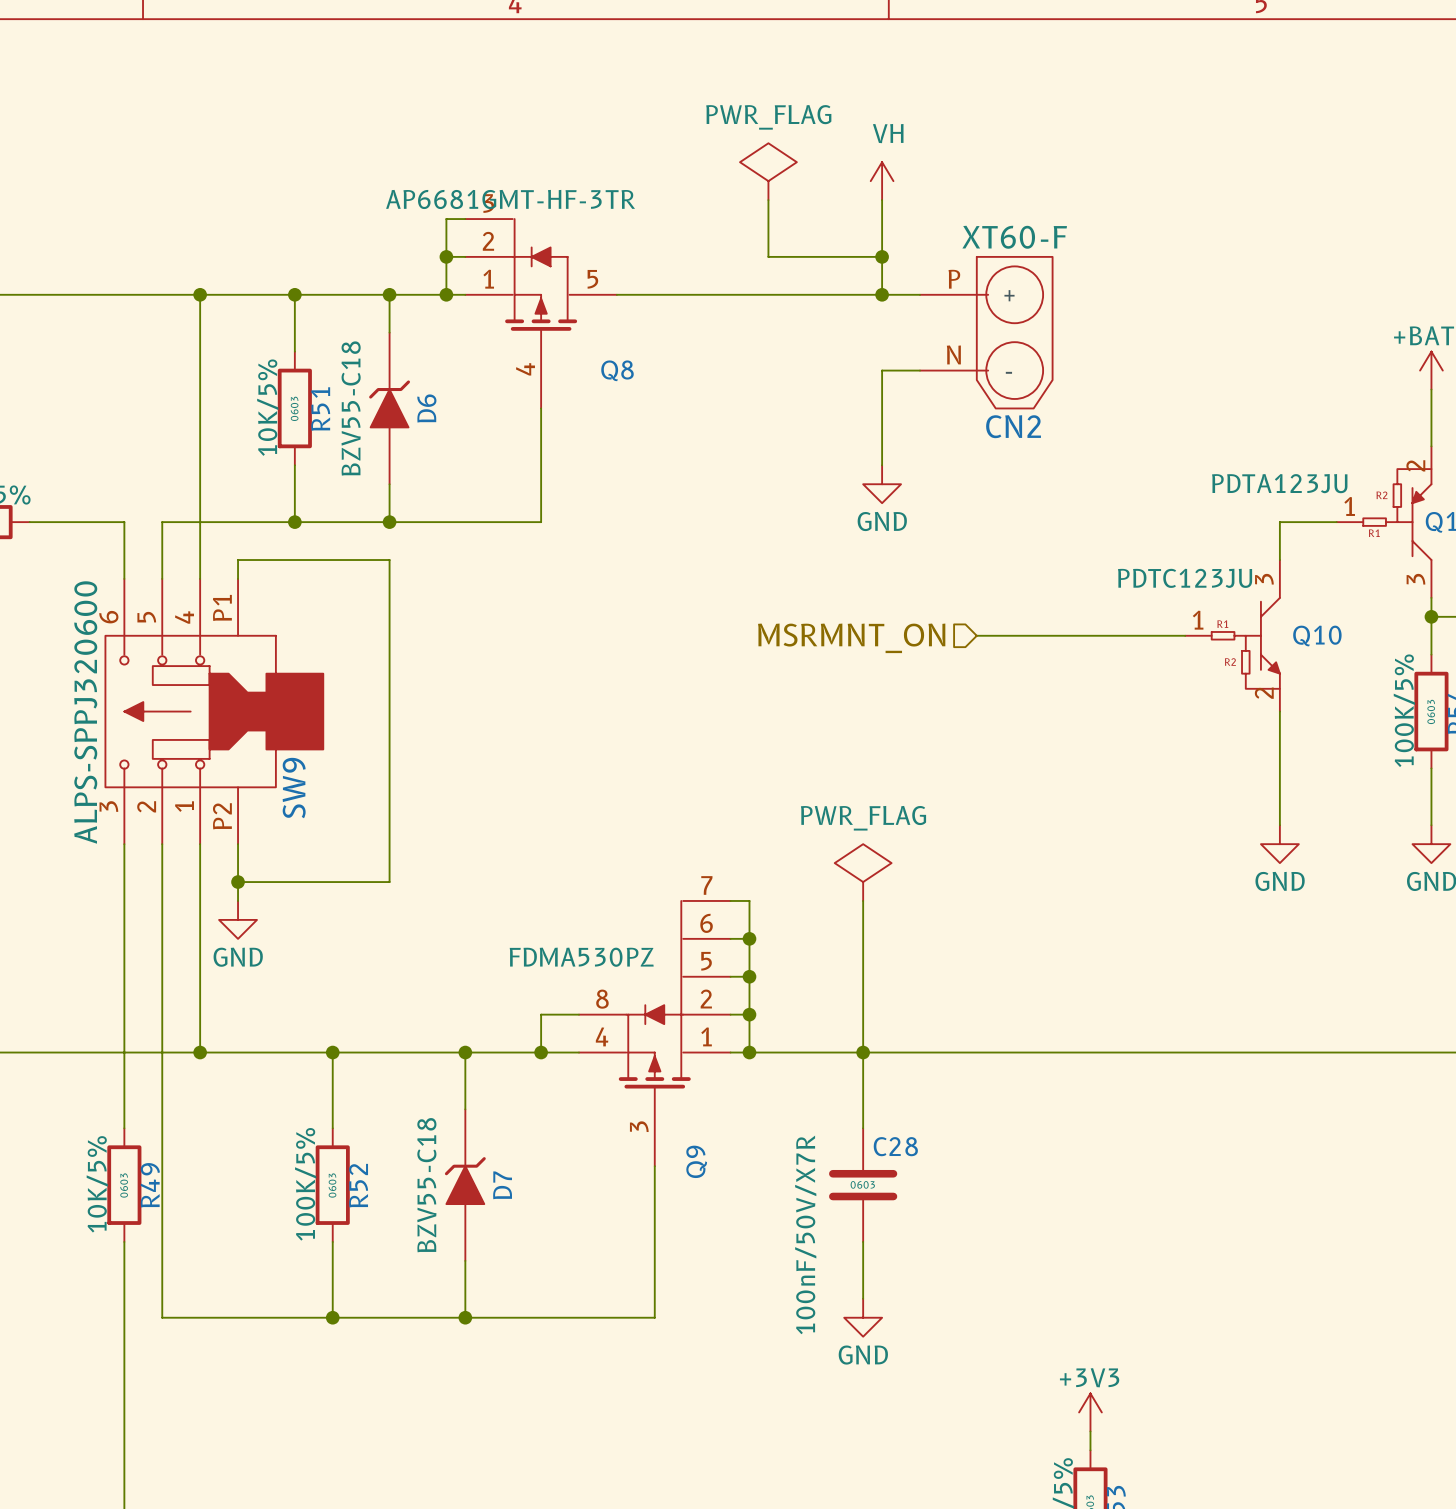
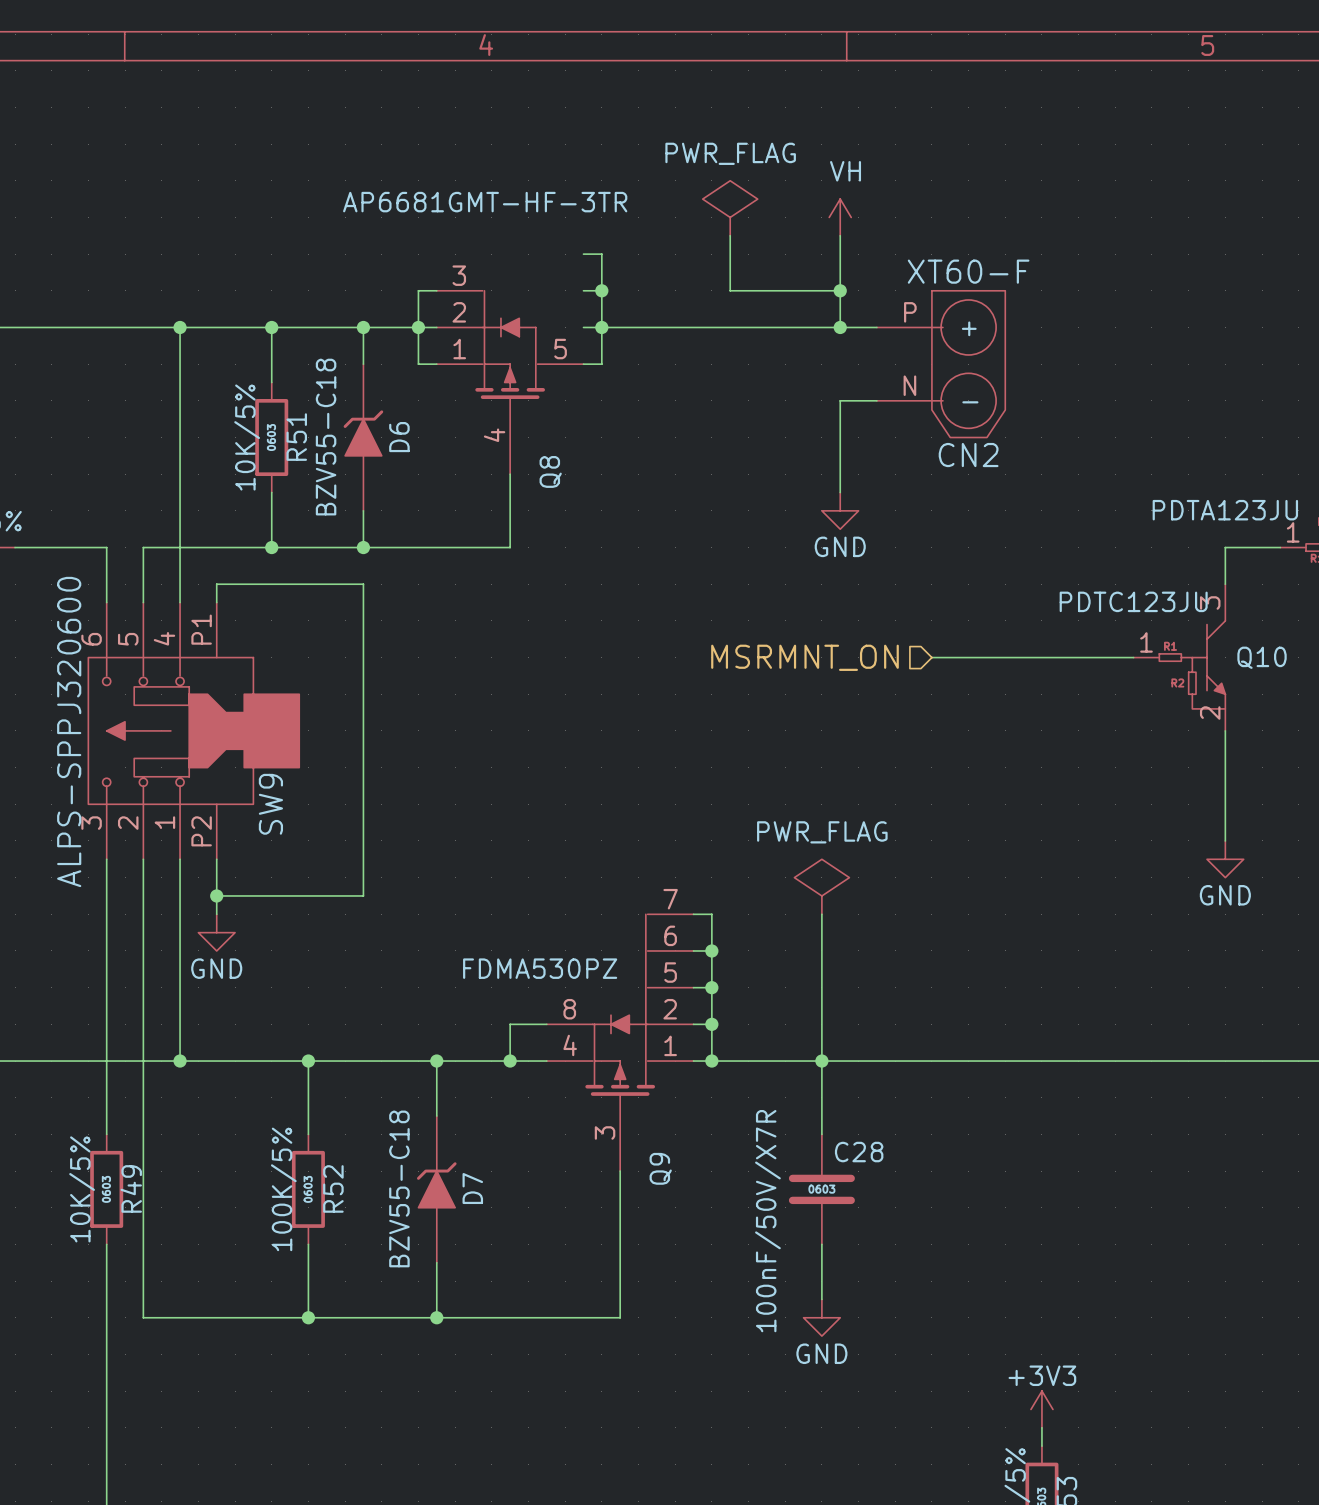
Q8 value position: AP6681GMT-HF-3TR (510, 199) -> AP6681GMT-HF-3TR (485, 202)
wire: (465, 219) (446, 219) (446, 256) -> none
wire: none -> (583, 254) (601, 254) (601, 364) (583, 364)
junction: (446, 256) -> none
wire: none -> (583, 290) (601, 290)
junction: none -> (601, 290)
wire: none -> (418, 327) (418, 364) (436, 364)
junction: none -> (601, 327)
Q8 position: (541, 313) -> (510, 382)
Q8 name rotation: 0° (617, 370) -> 90° counterclockwise (550, 471)

